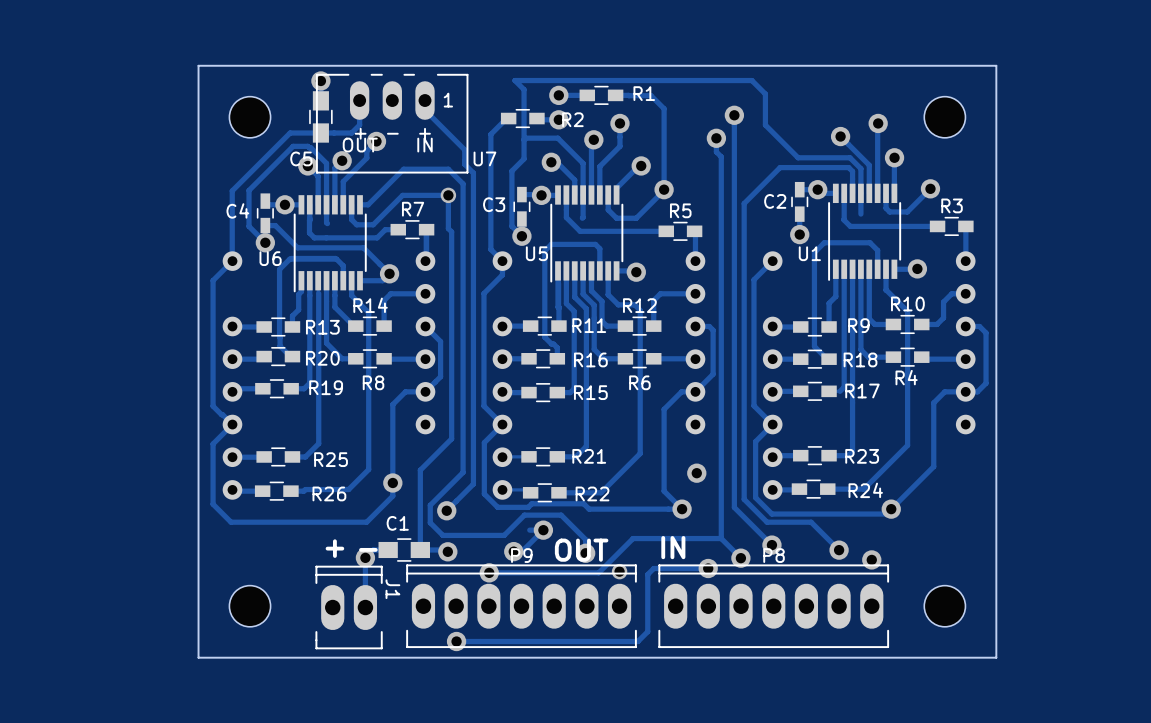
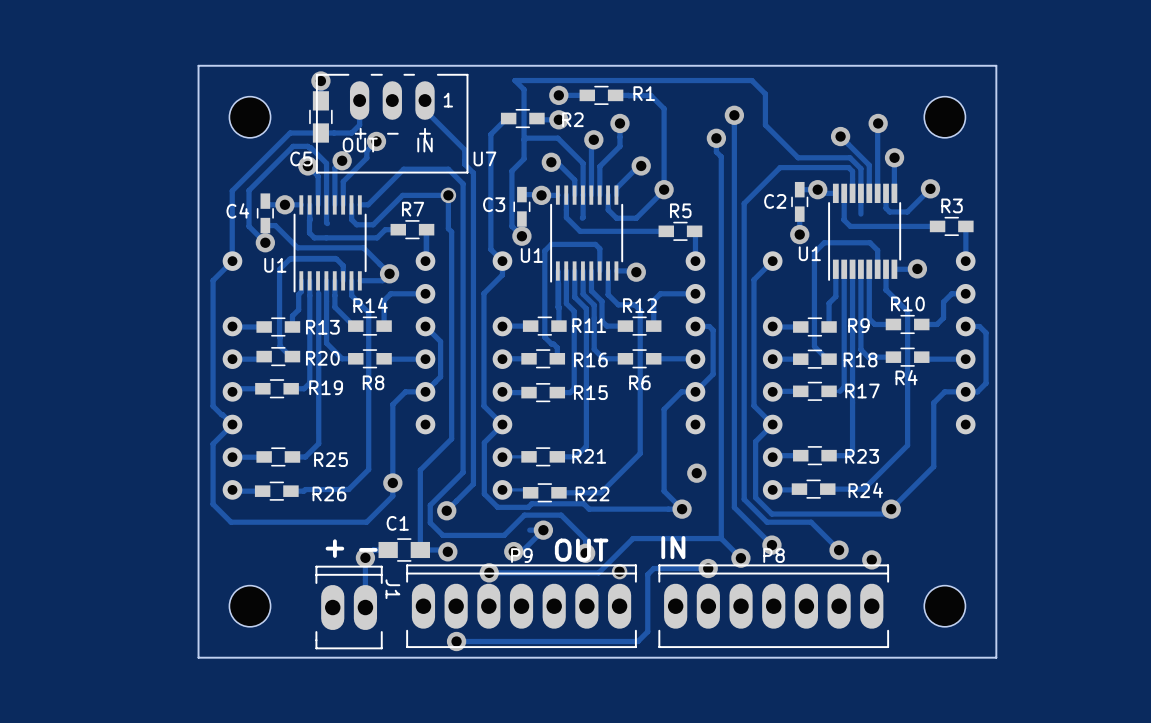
U5: (586, 233) -> none
U1: none -> (586, 234)
U6: (330, 243) -> none
U1: none -> (330, 243)

